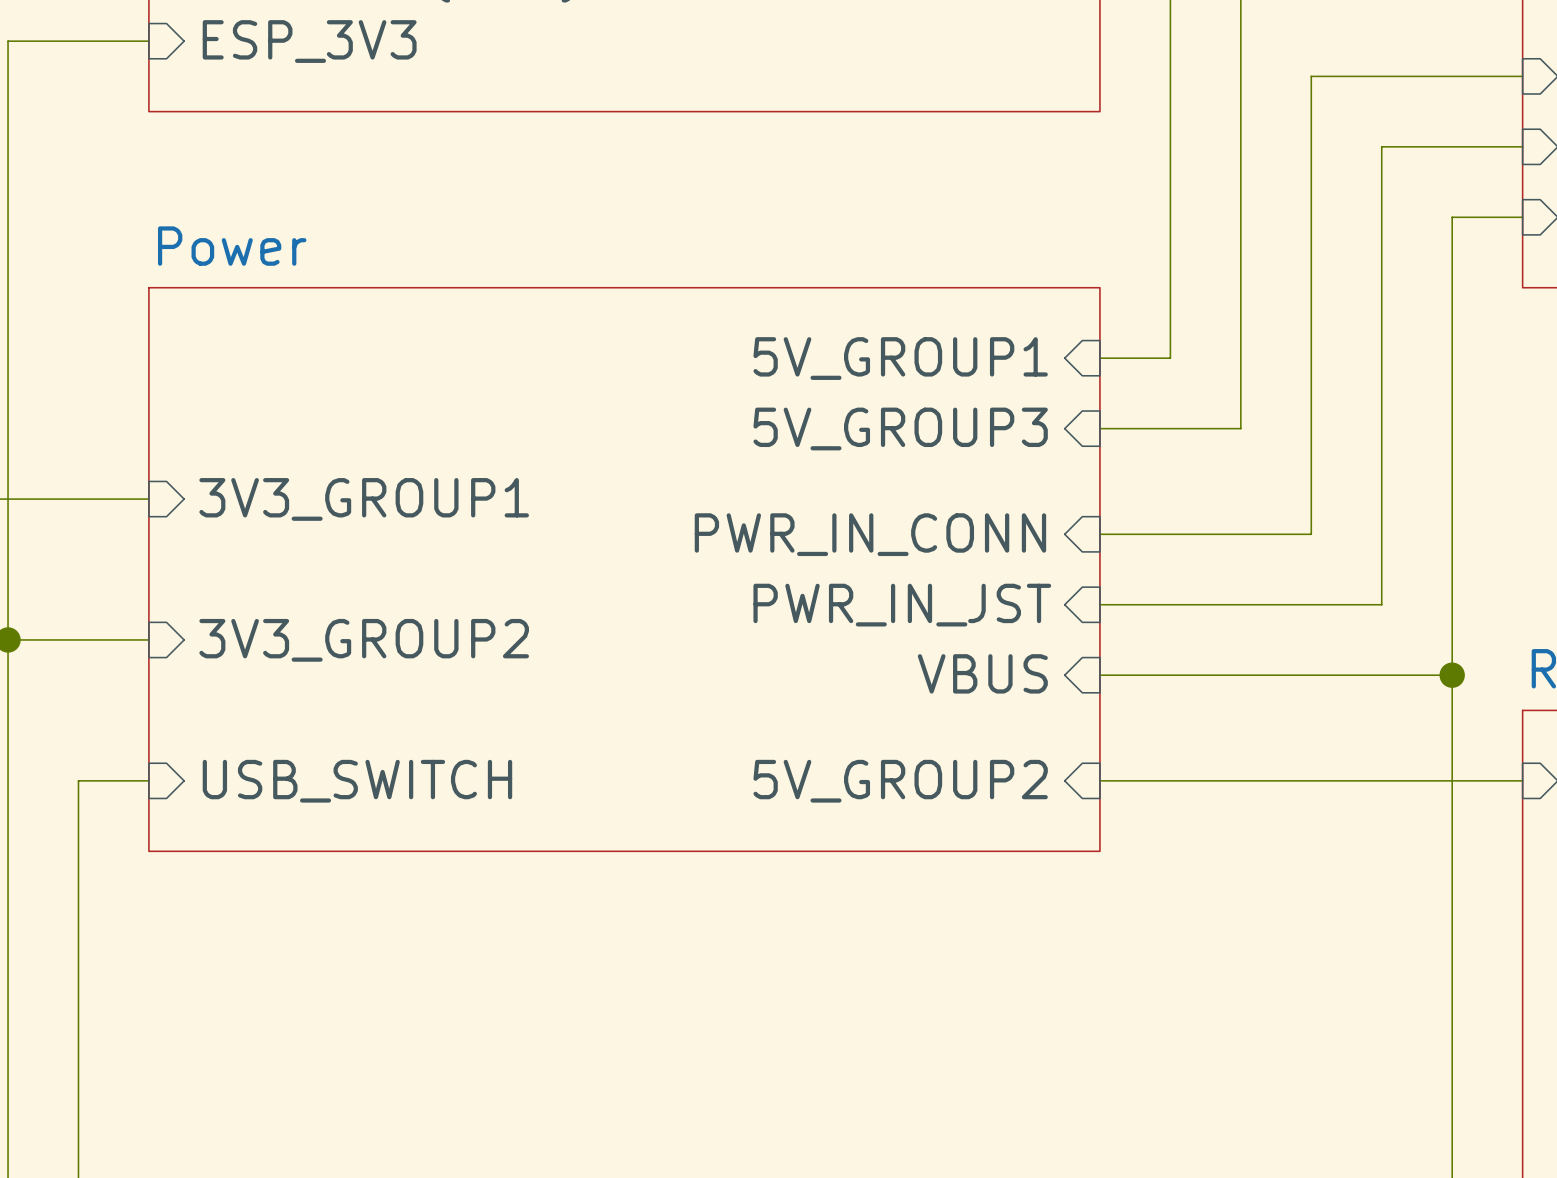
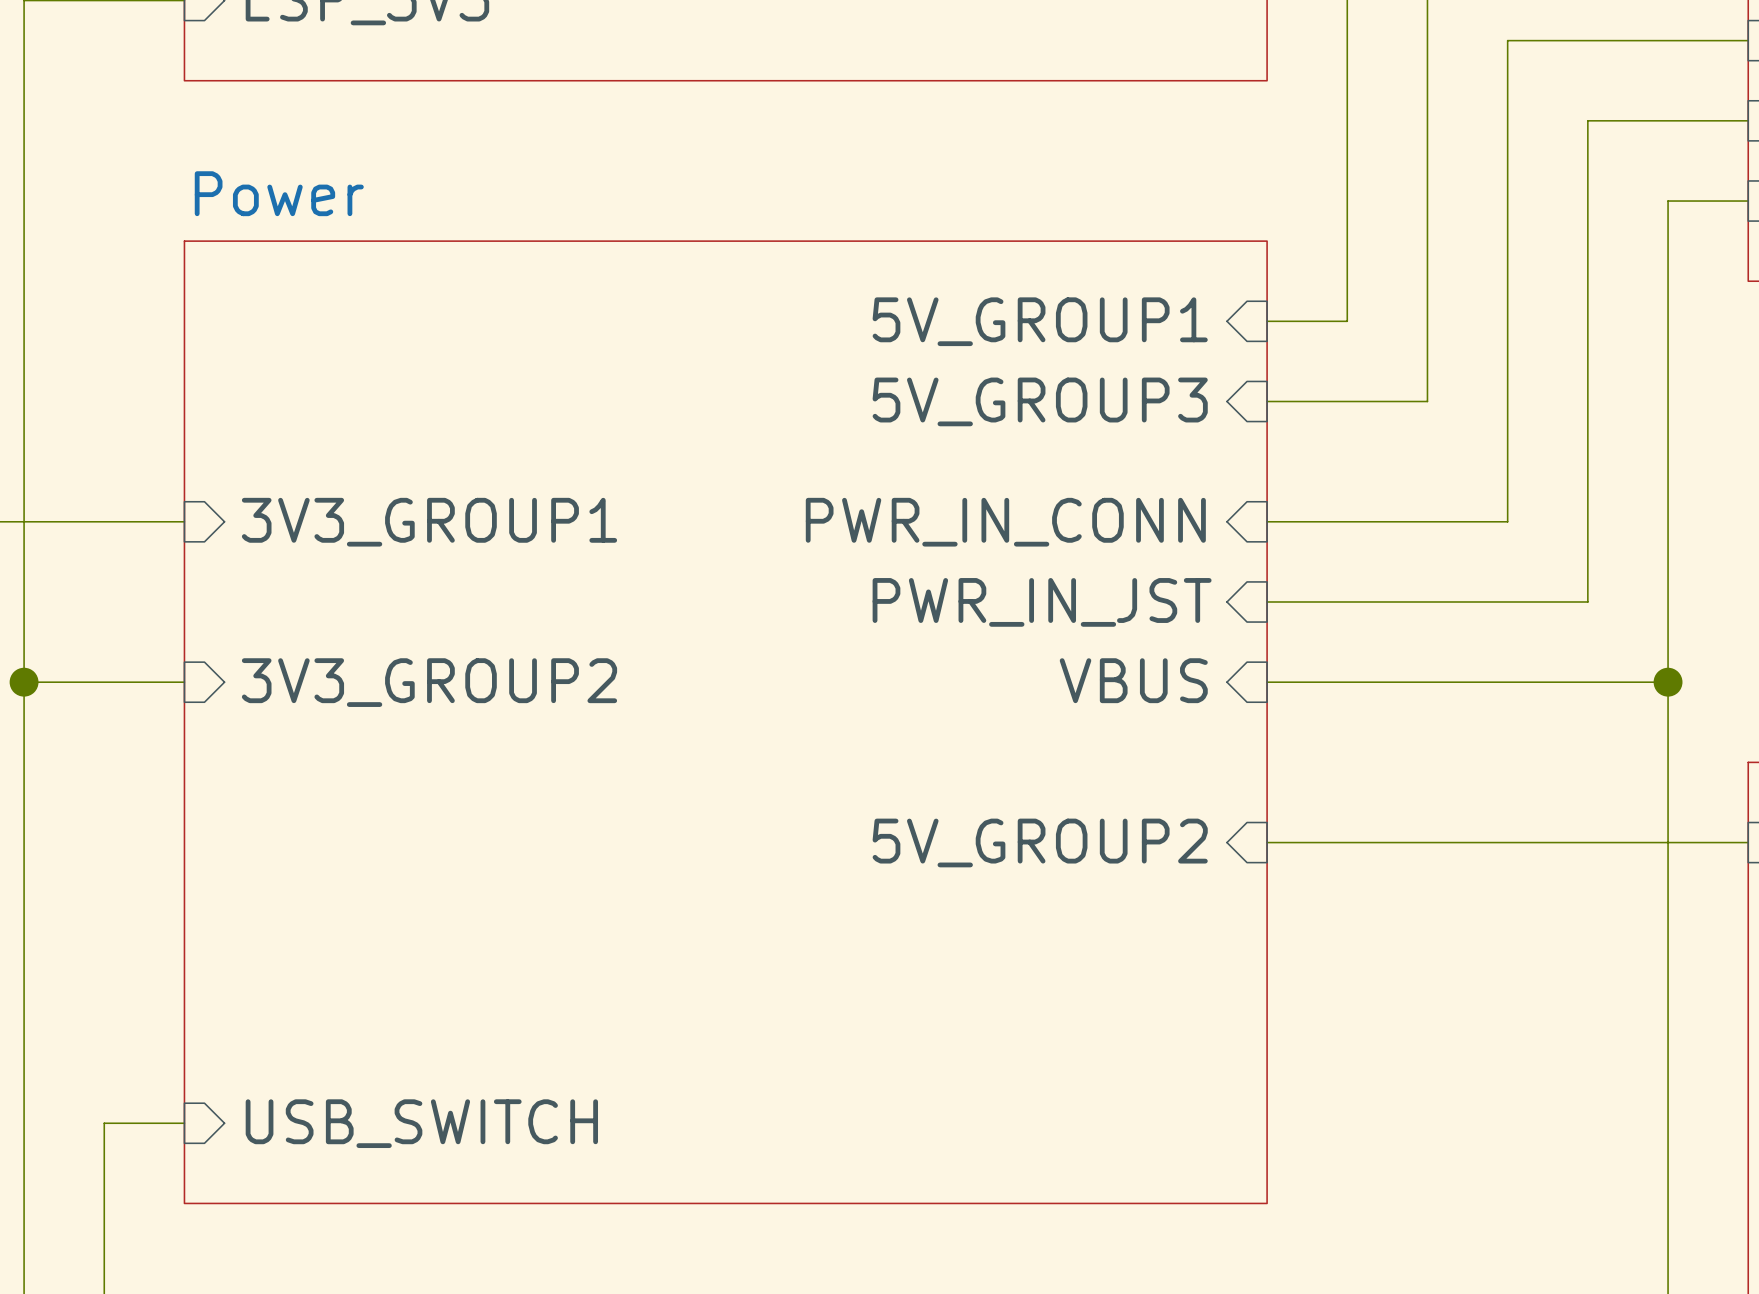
wire: (1170, 322) (1170, 358) (1099, 358) -> (1347, 321) (1267, 321)
sheet pin position: 5V_GROUP1 (900, 358) -> 5V_GROUP1 (1040, 321)
wire: (1240, 393) (1240, 428) (1099, 428) -> (1427, 401) (1267, 401)
sheet pin position: 5V_GROUP3 (900, 428) -> 5V_GROUP3 (1040, 401)
wire: (1311, 499) (1311, 534) (1099, 534) -> (1507, 521) (1267, 521)
sheet pin position: PWR_IN_CONN (870, 534) -> PWR_IN_CONN (1005, 522)
sheet Power: (624, 569) -> none
wire: (1381, 569) (1381, 604) (1099, 604) -> (1587, 601) (1267, 601)
sheet pin position: PWR_IN_JST (902, 605) -> PWR_IN_JST (1042, 602)
sheet pin position: VBUS (982, 673) -> VBUS (1133, 680)
sheet Power: none -> (725, 722)
wire: (1099, 675) (1452, 675) -> (1267, 682) (1668, 682)
junction position: (1452, 675) -> (1668, 682)
wire: (148, 780) (78, 780) (78, 1027) -> (184, 1123) (104, 1123)
sheet pin position: USB_SWITCH (357, 781) -> USB_SWITCH (421, 1123)

